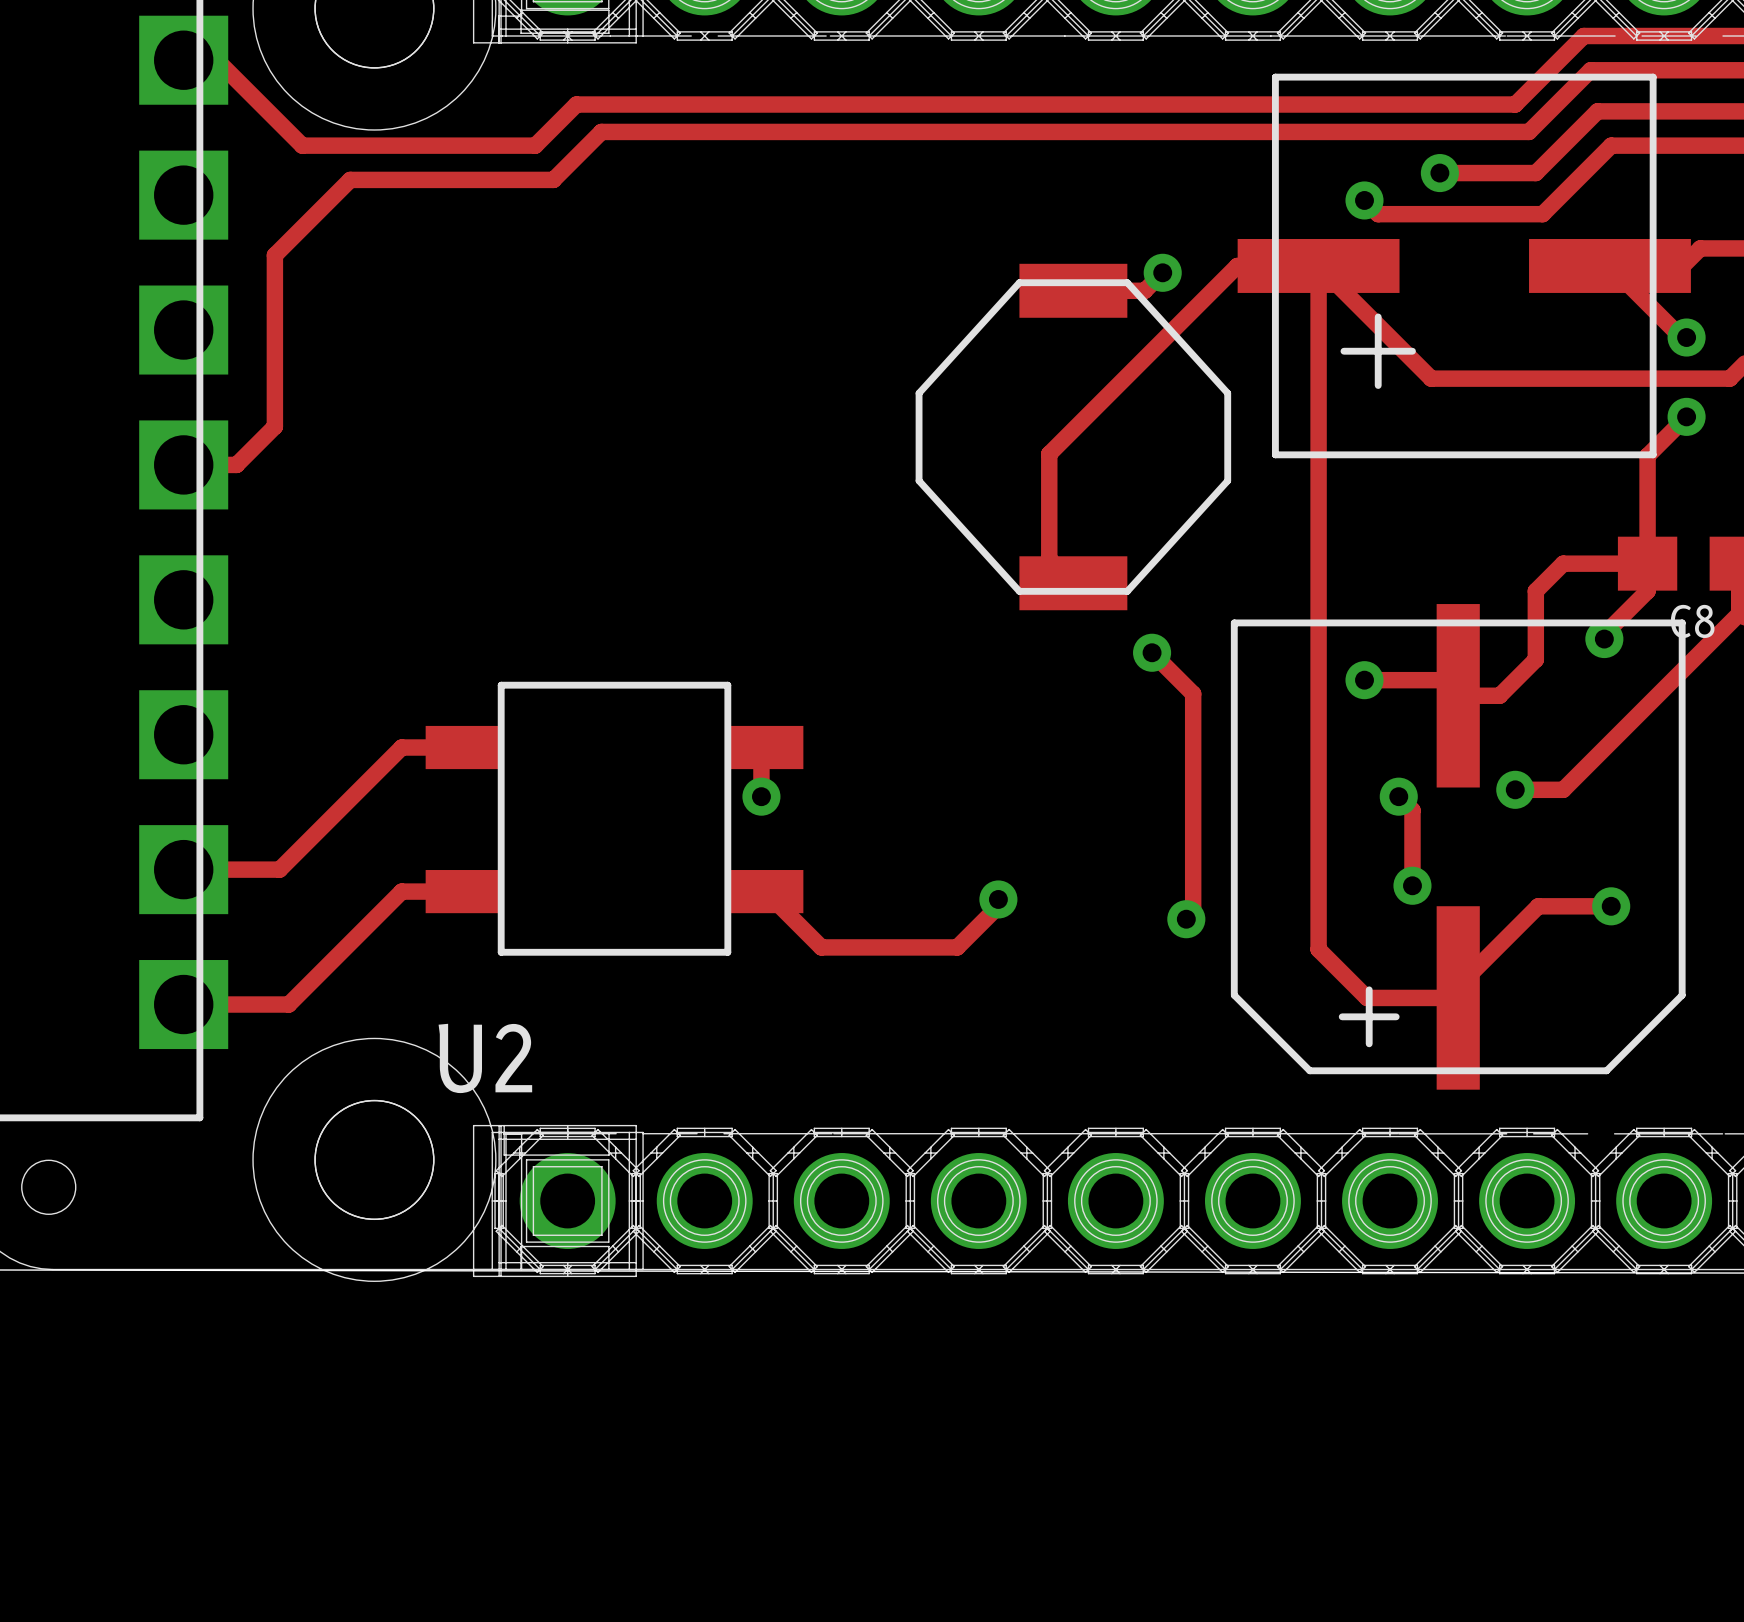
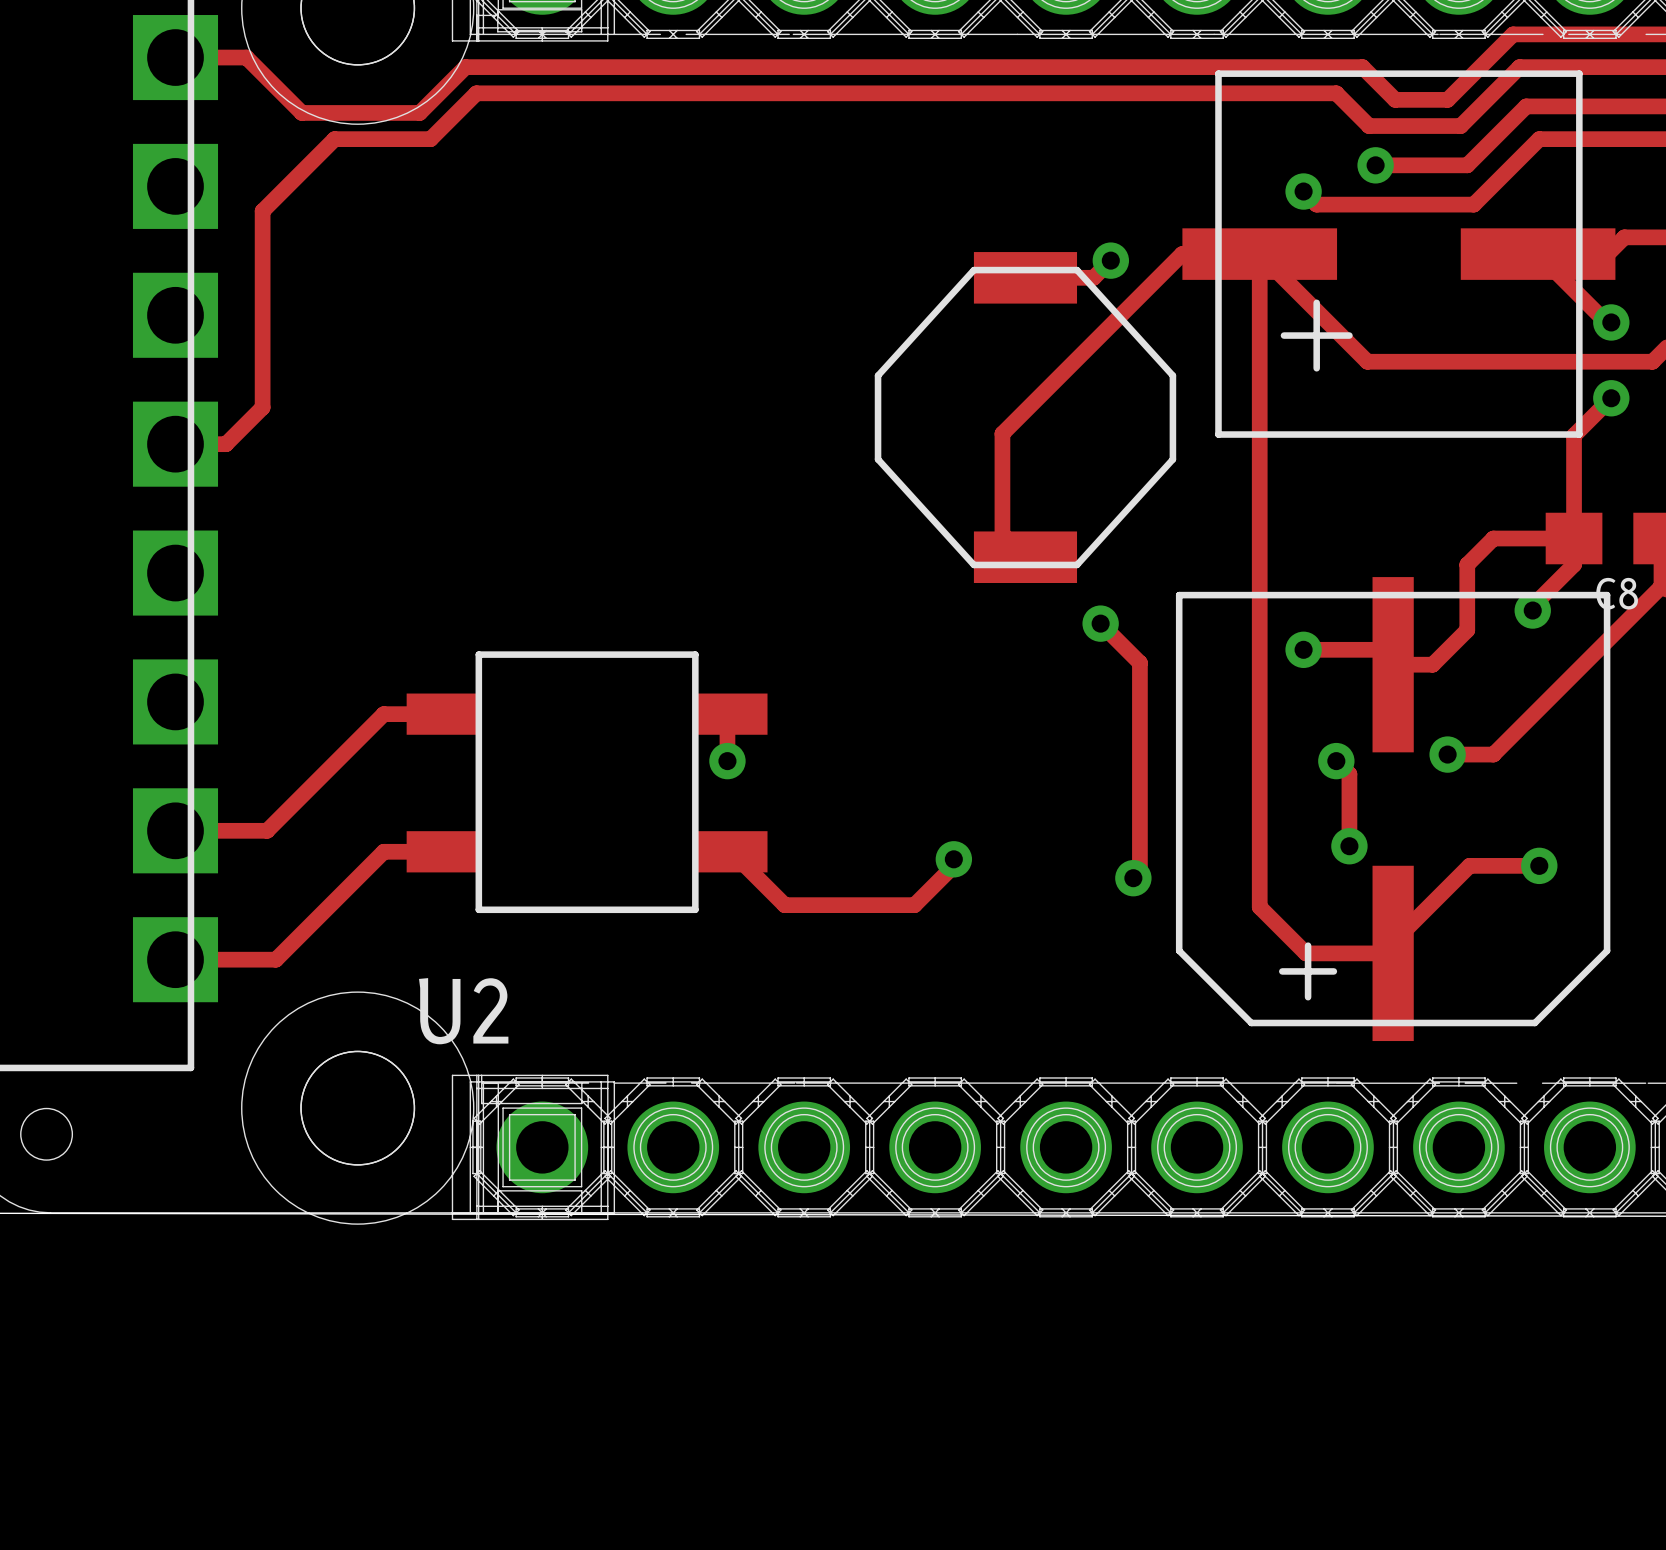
track: (216, 60) (302, 145) (350, 145) -> (262, 243) (262, 211) (334, 139)
track: none -> (207, 57) (246, 57) (301, 112) (419, 112) (465, 67) (1362, 67) (1395, 99)
track: (1460, 104) (576, 104) (535, 145) (450, 145) -> (1369, 126) (1336, 93) (476, 93) (430, 139)
track: (1433, 131) (601, 131) (553, 179) (350, 179) (274, 255) -> none

